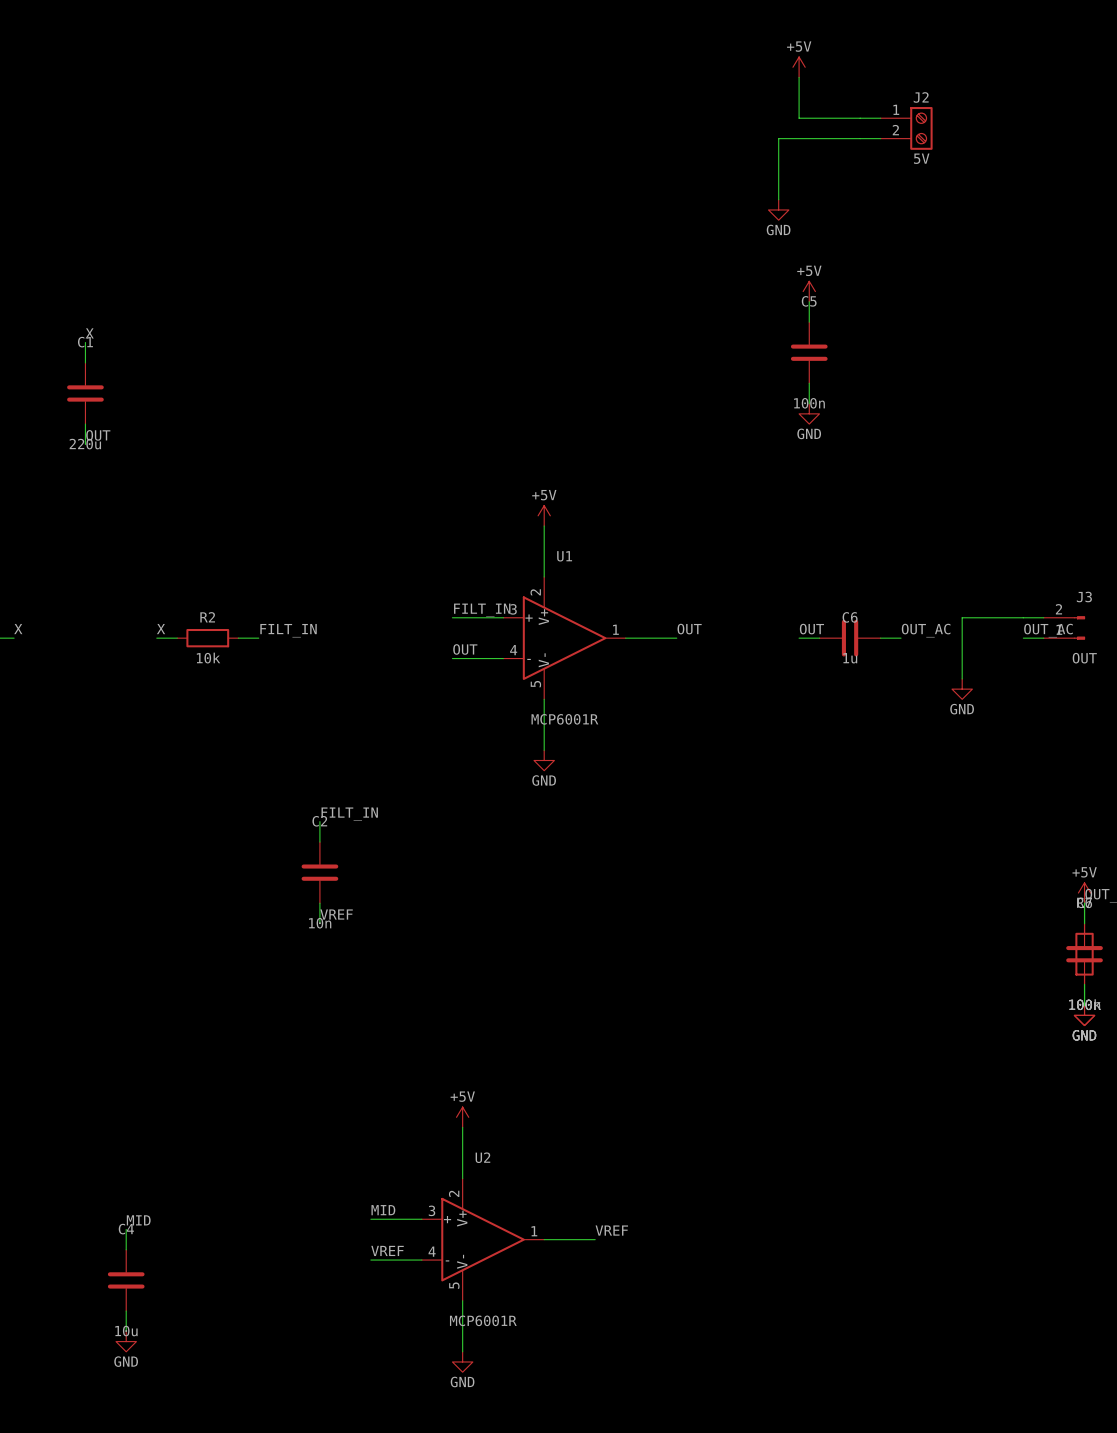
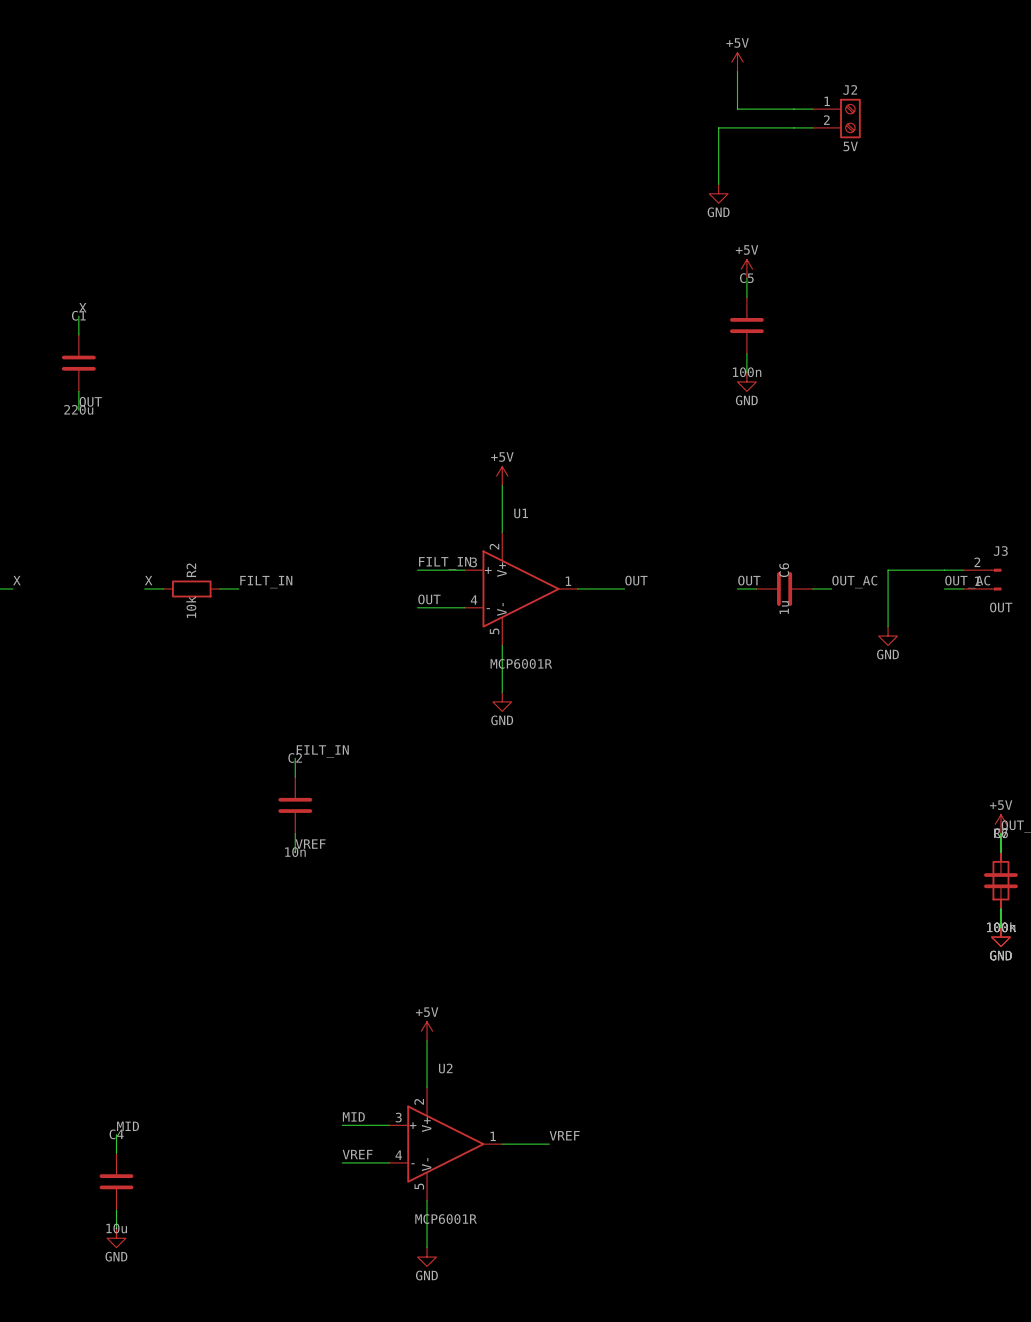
R2 name rotation: 0° (207, 617) -> 90° counterclockwise (191, 570)
C6 name rotation: 0° (850, 617) -> 90° counterclockwise (784, 570)
R2 value rotation: 0° (208, 658) -> 90° counterclockwise (191, 607)
C6 value rotation: 0° (850, 658) -> 90° counterclockwise (784, 607)

